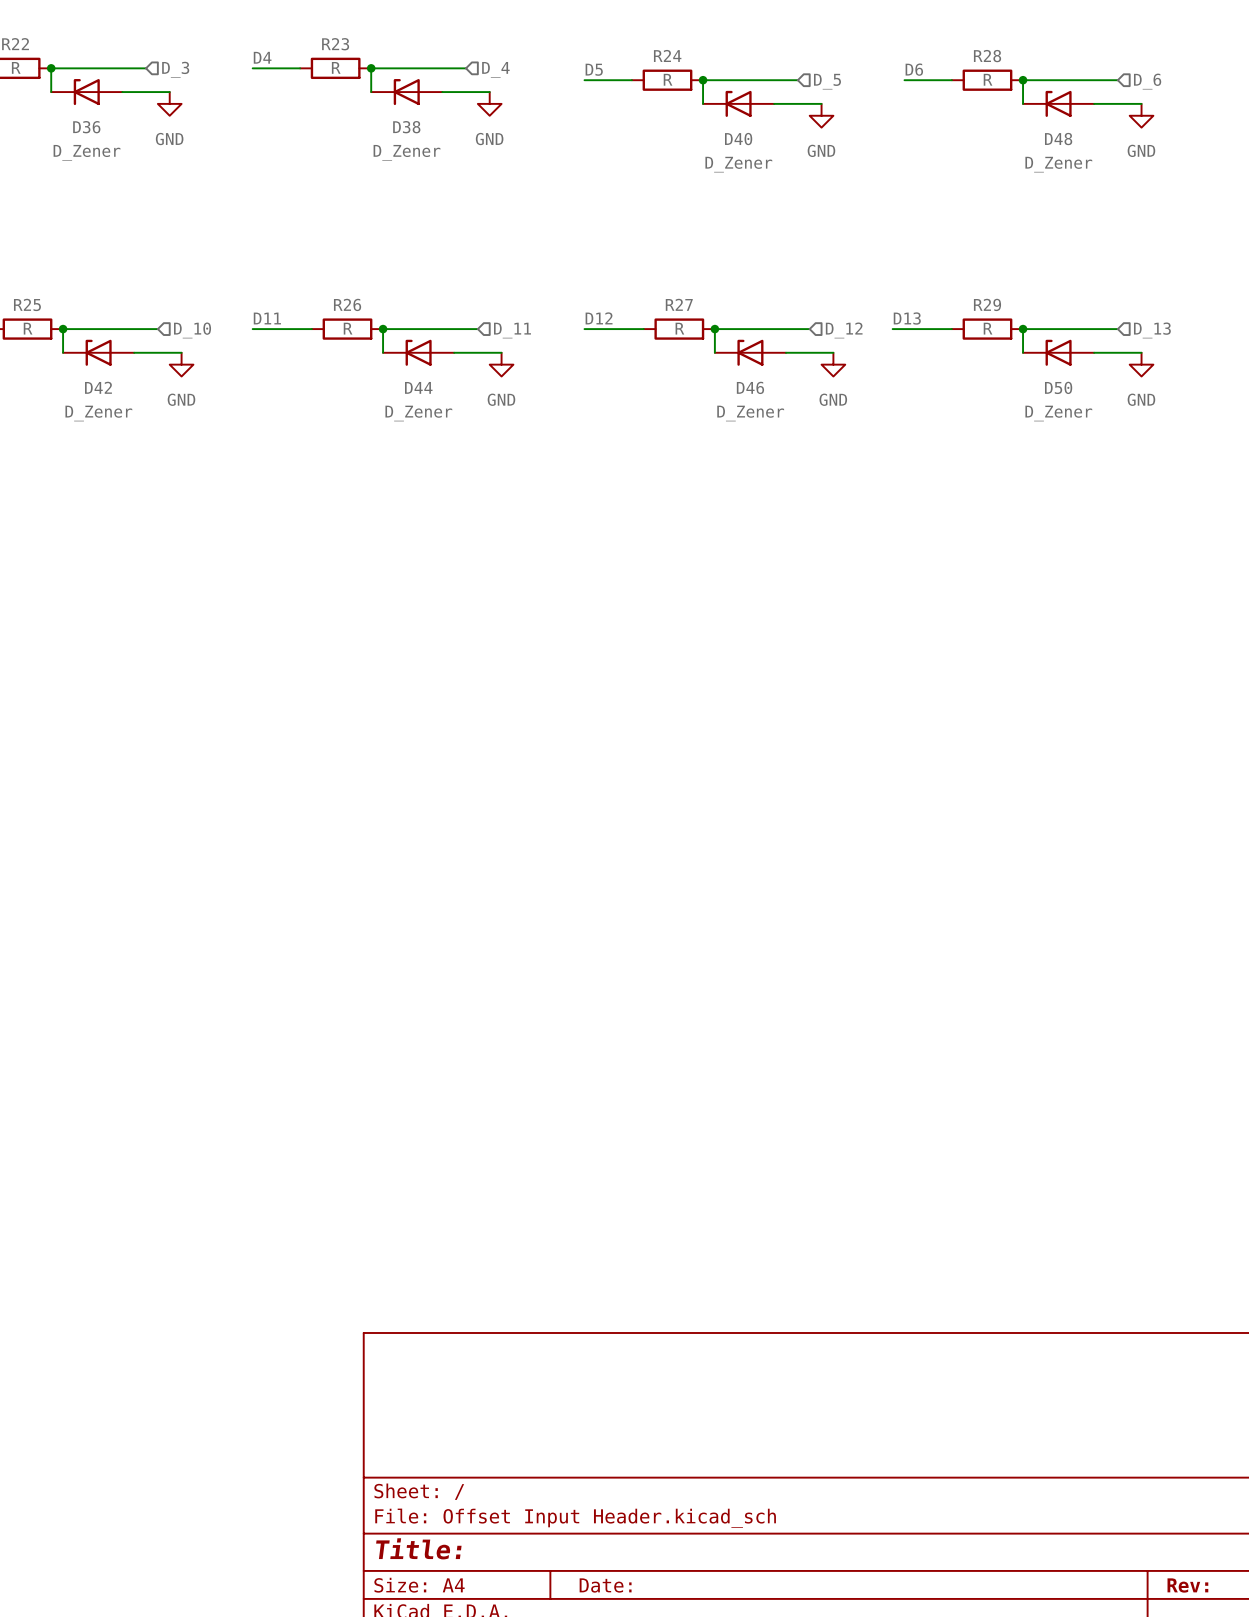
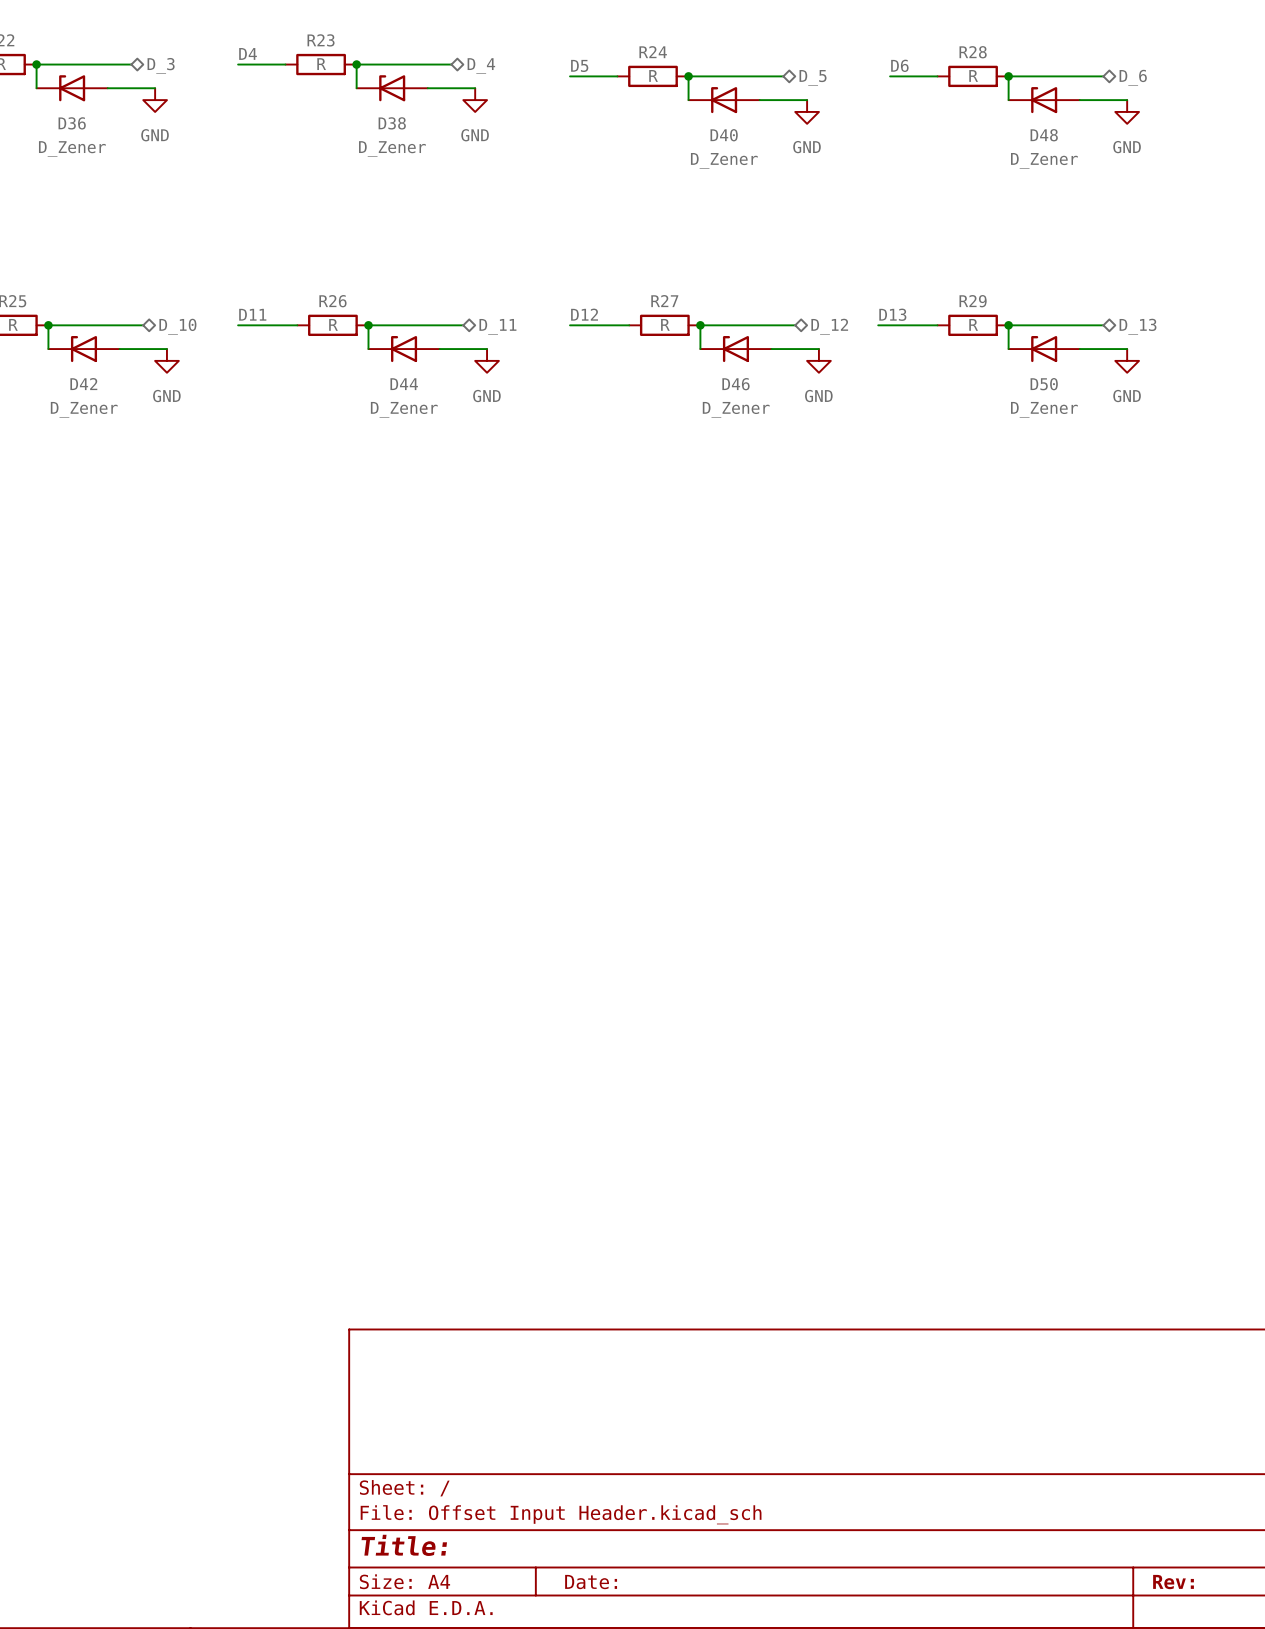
hierarchical label shape: input (175, 69) -> bidirectional (161, 65)
hierarchical label shape: input (495, 69) -> bidirectional (481, 66)
hierarchical label shape: input (827, 81) -> bidirectional (813, 77)
hierarchical label shape: input (1147, 81) -> bidirectional (1133, 77)
hierarchical label shape: input (192, 330) -> bidirectional (177, 326)
hierarchical label shape: input (512, 330) -> bidirectional (497, 326)
hierarchical label shape: input (844, 330) -> bidirectional (829, 326)
hierarchical label shape: input (1152, 330) -> bidirectional (1138, 326)

